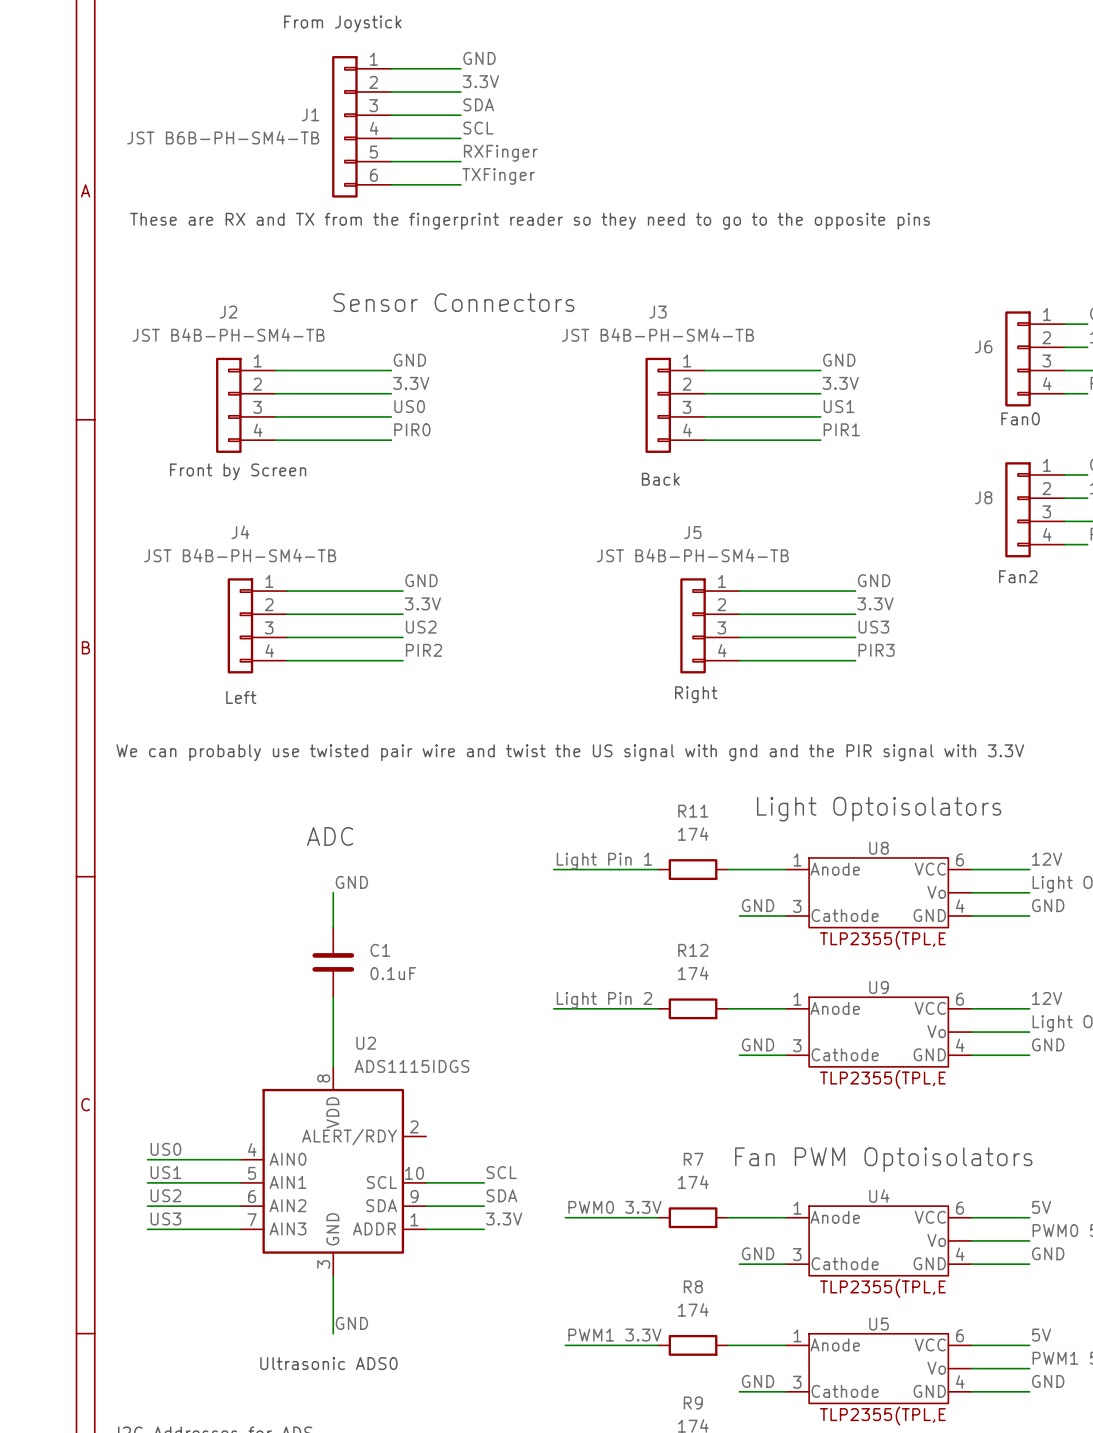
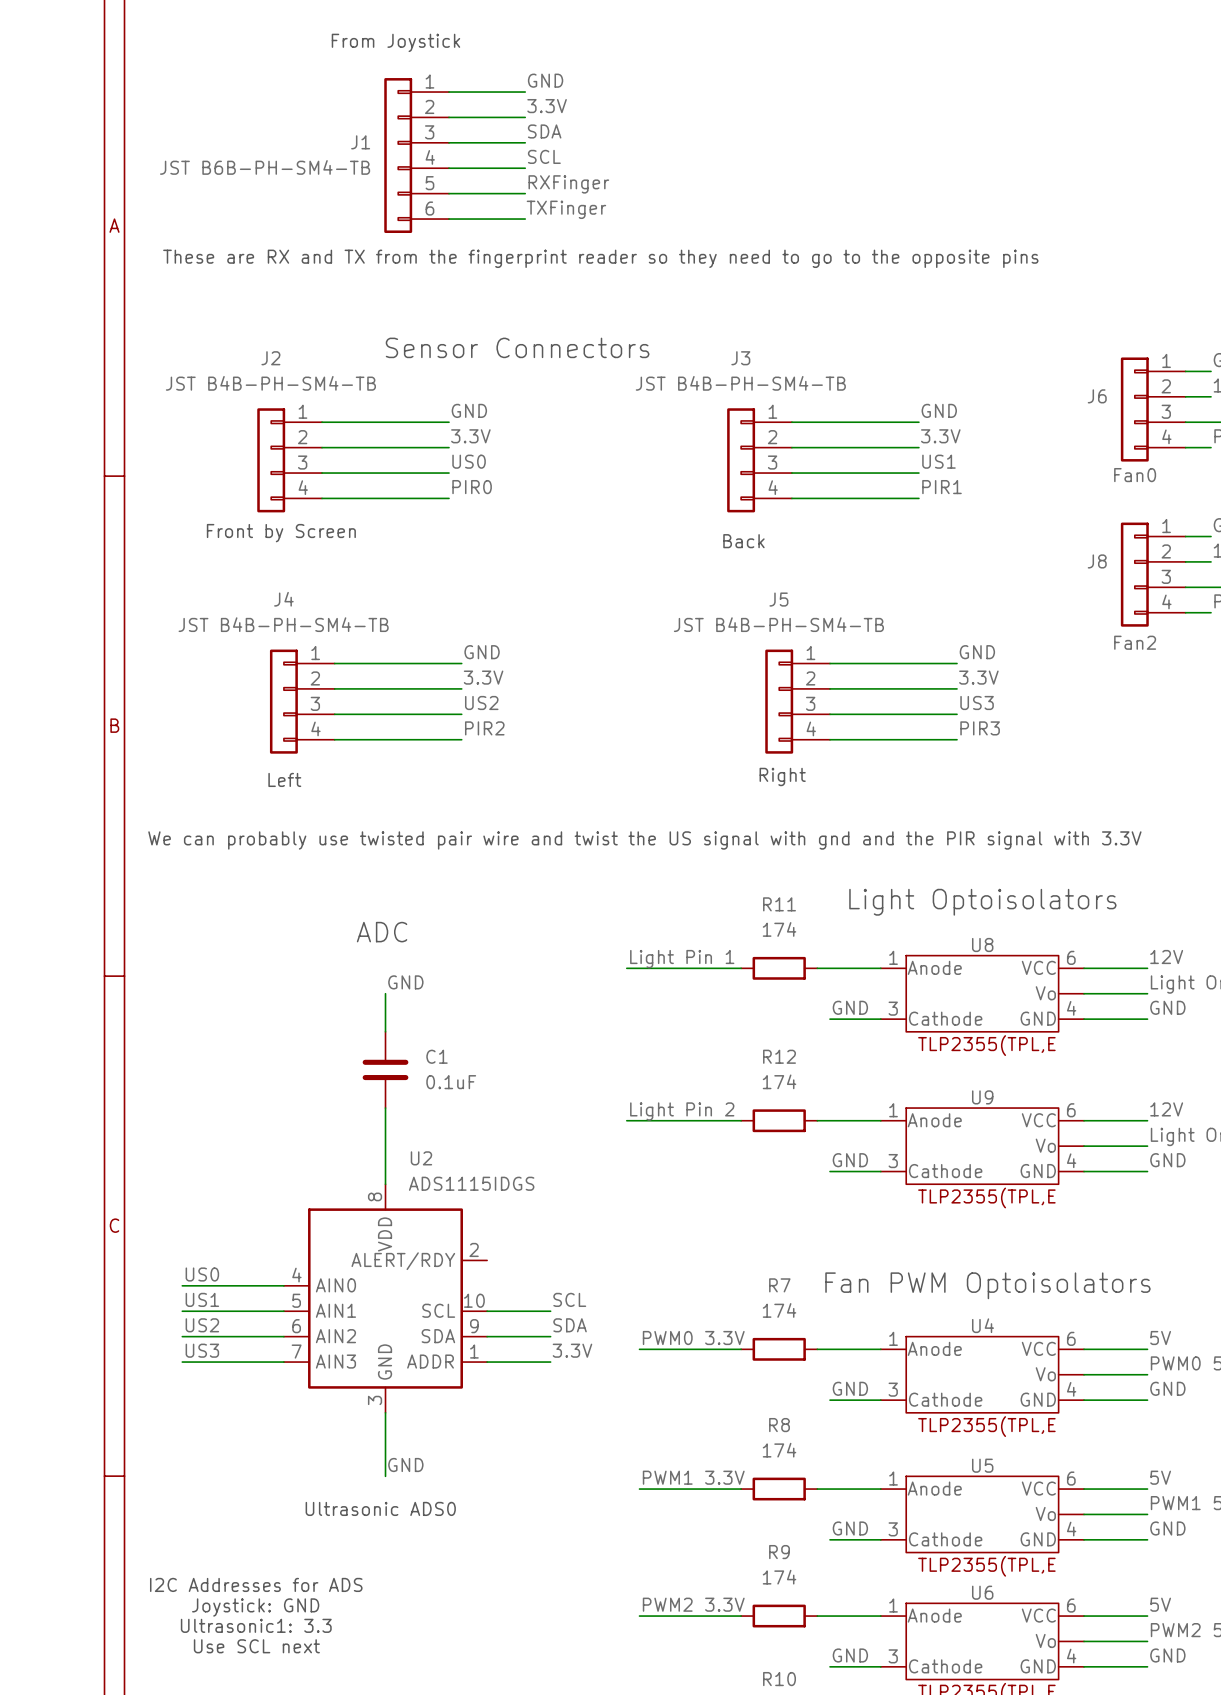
J6 text: none -> Fan0 (1135, 475)
text: Fan0 (1020, 418) -> none
J8 text: none -> Fan2 (1135, 642)
text: Fan2 (1018, 576) -> none

